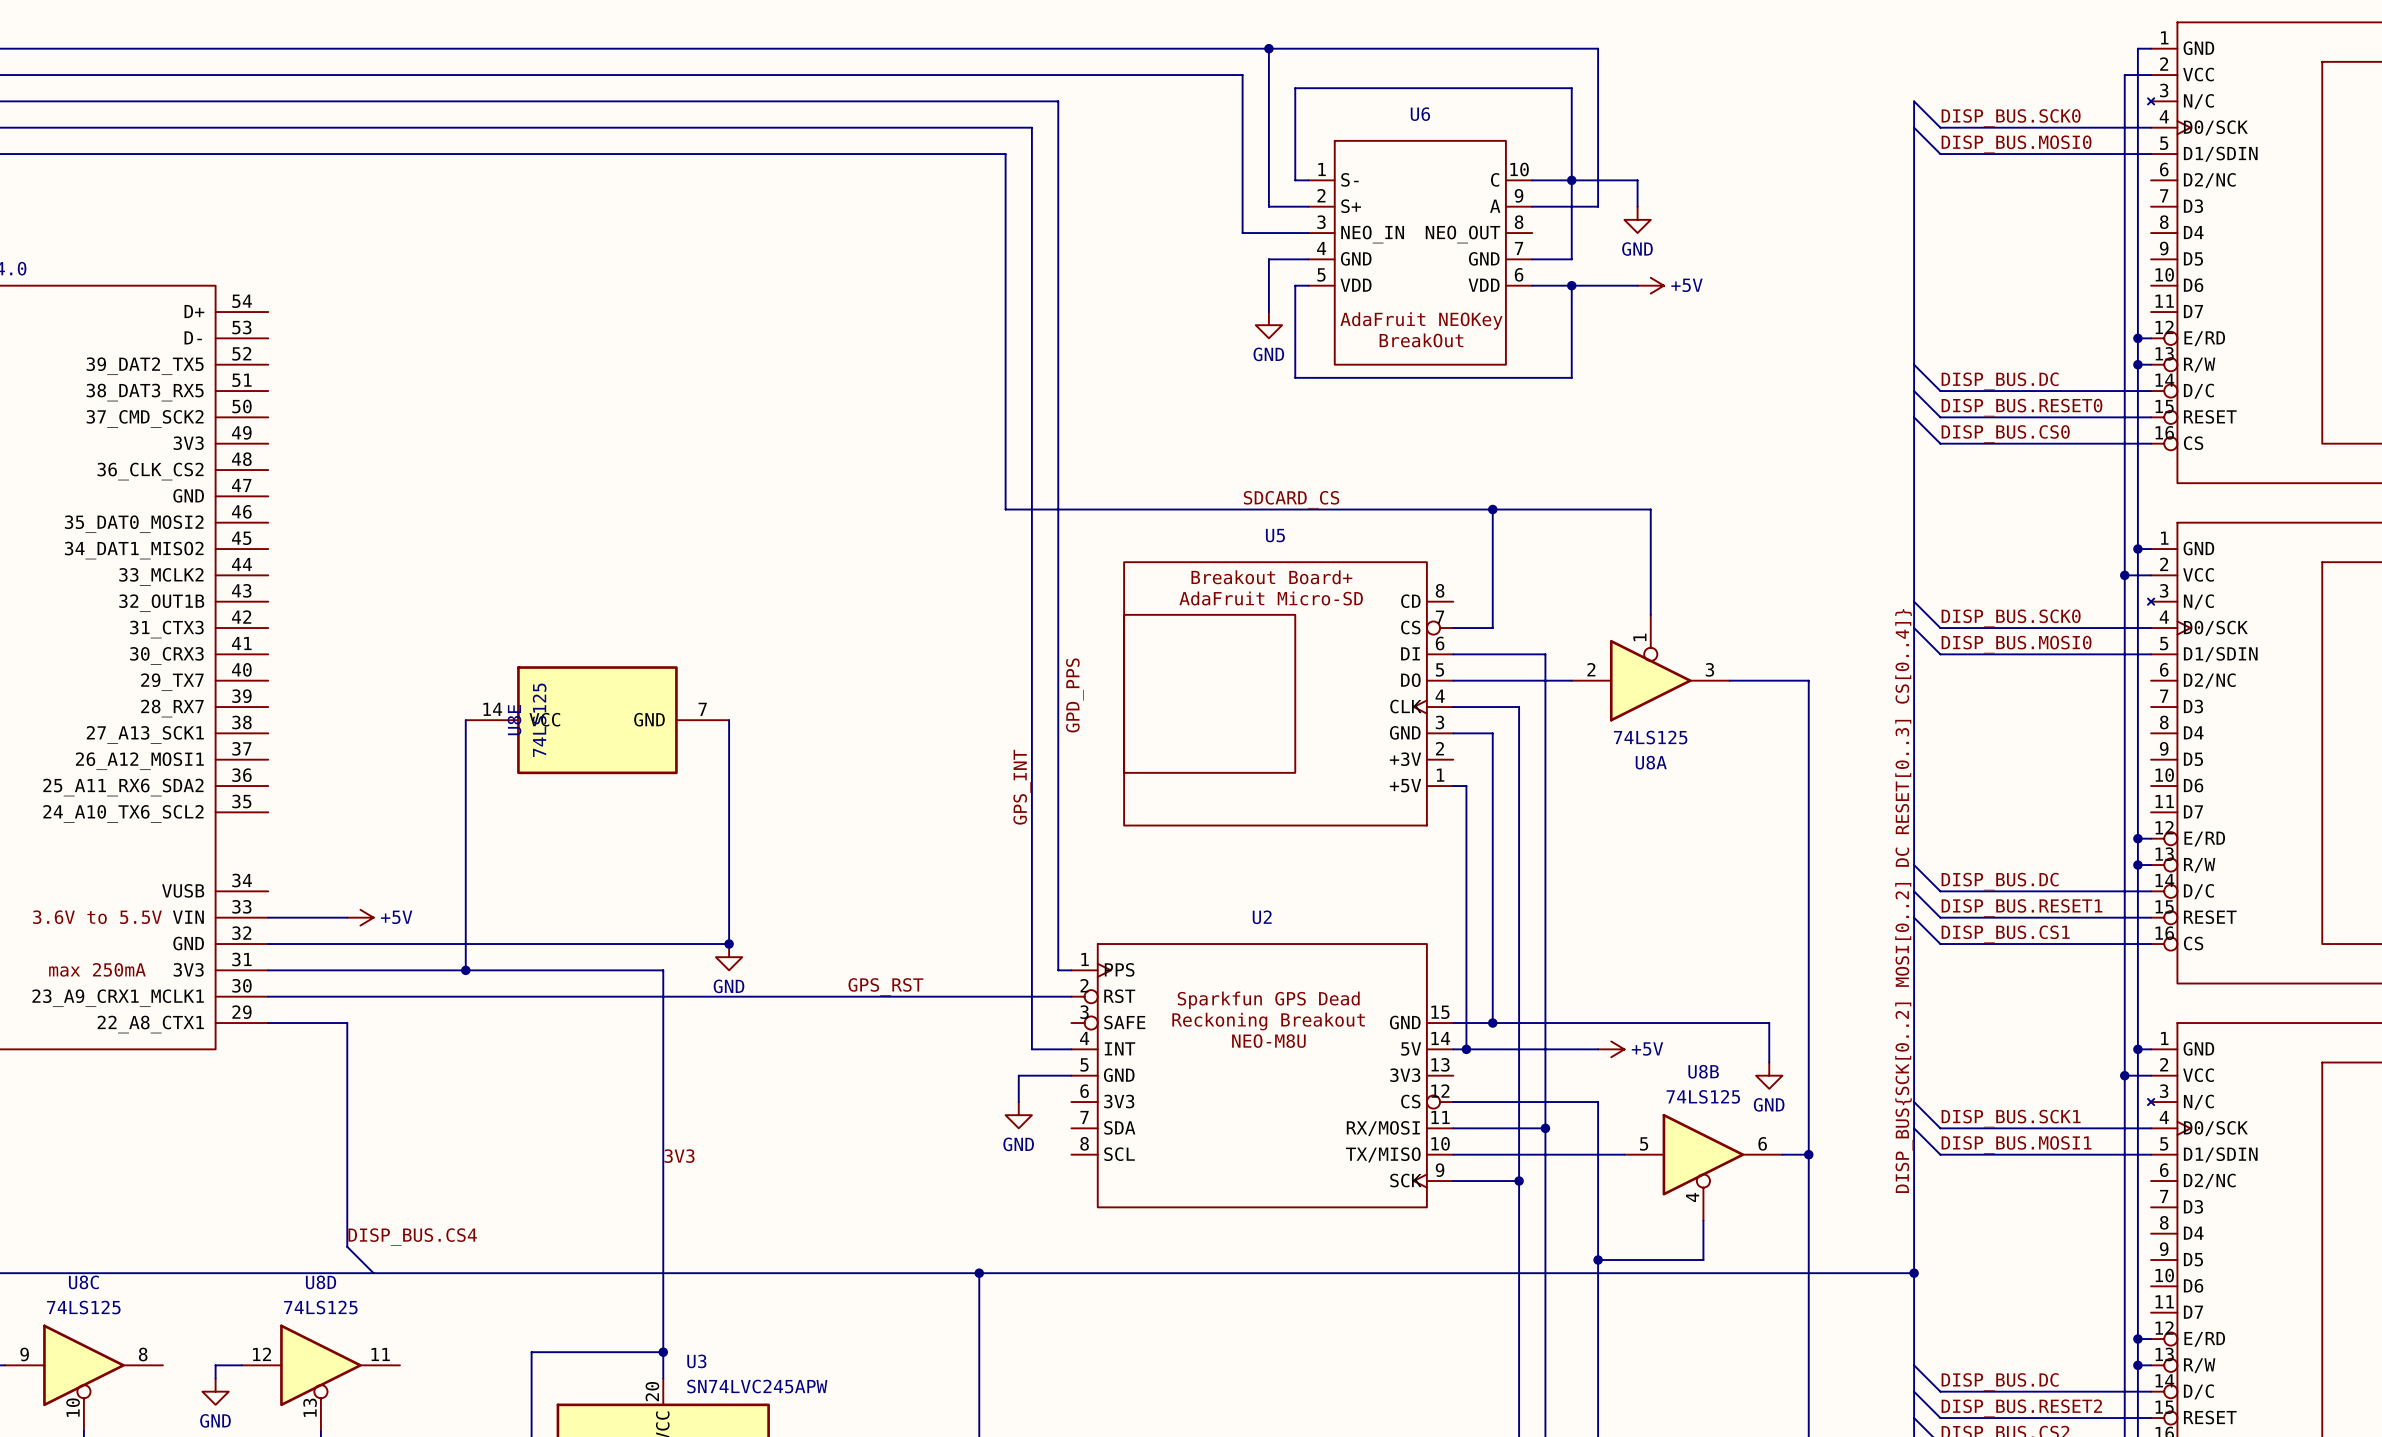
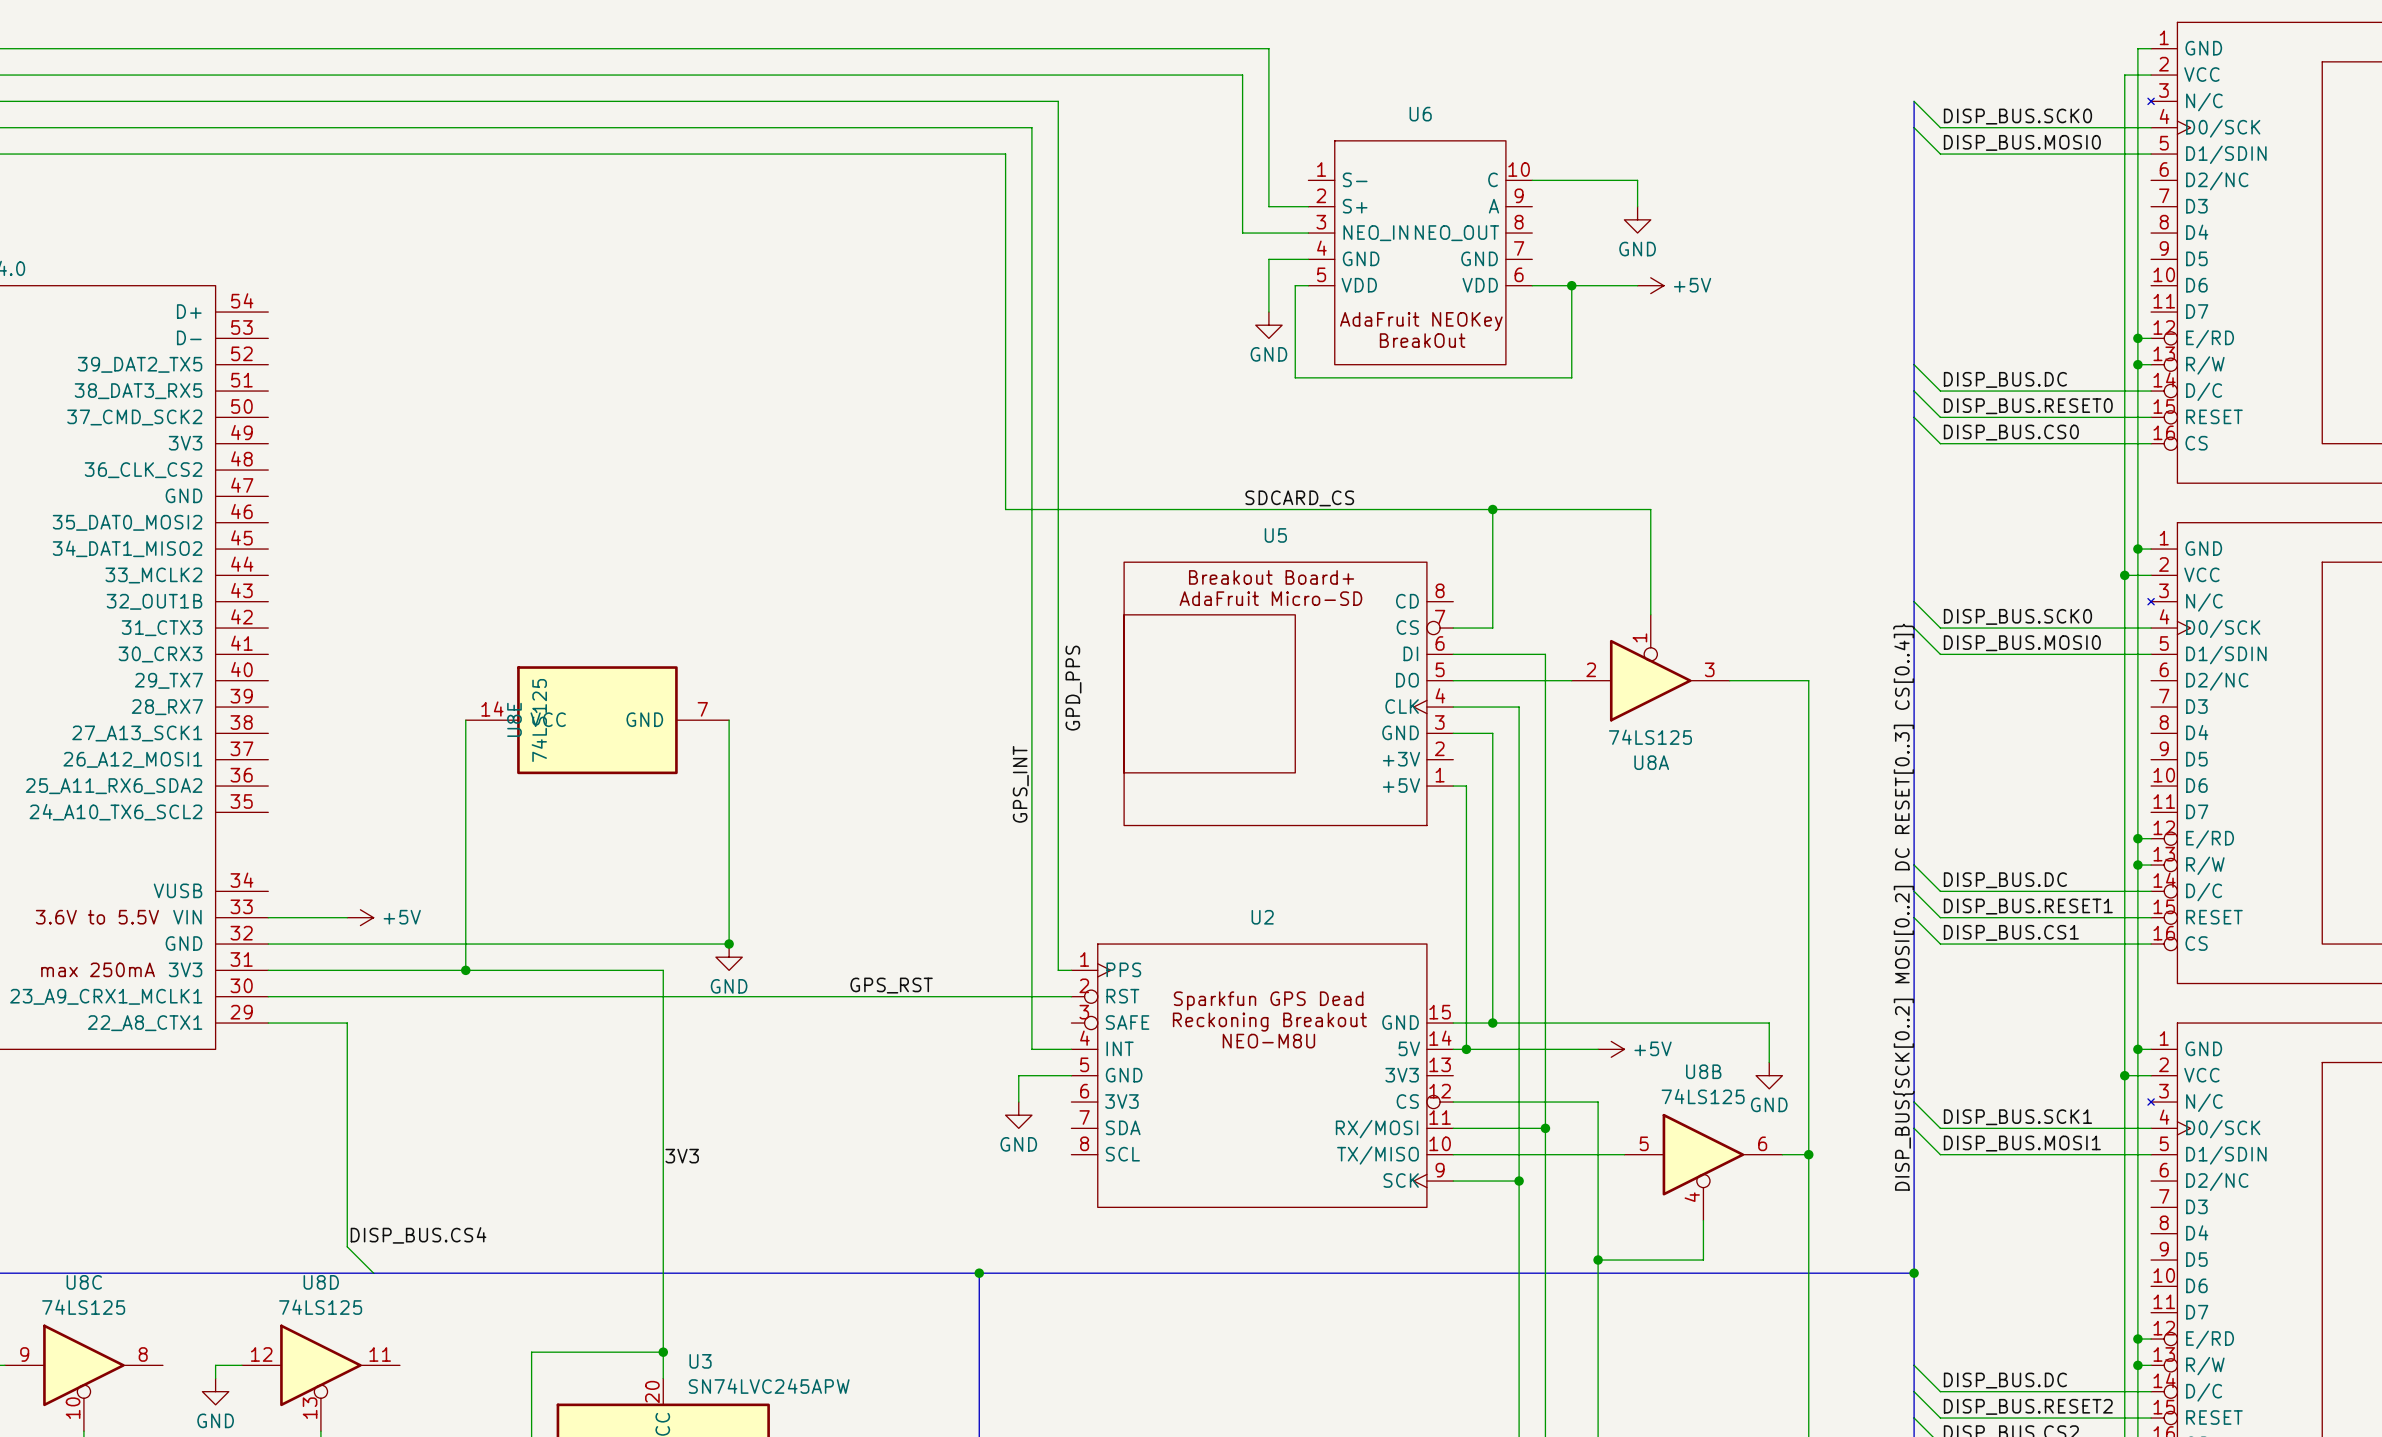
wire: (1268, 48) (1598, 48) (1598, 206) (1532, 206) -> none
junction: (1268, 48) -> none
wire: (1308, 180) (1295, 180) (1295, 88) (1571, 88) (1571, 259) (1532, 259) -> none
junction: (1571, 180) -> none

